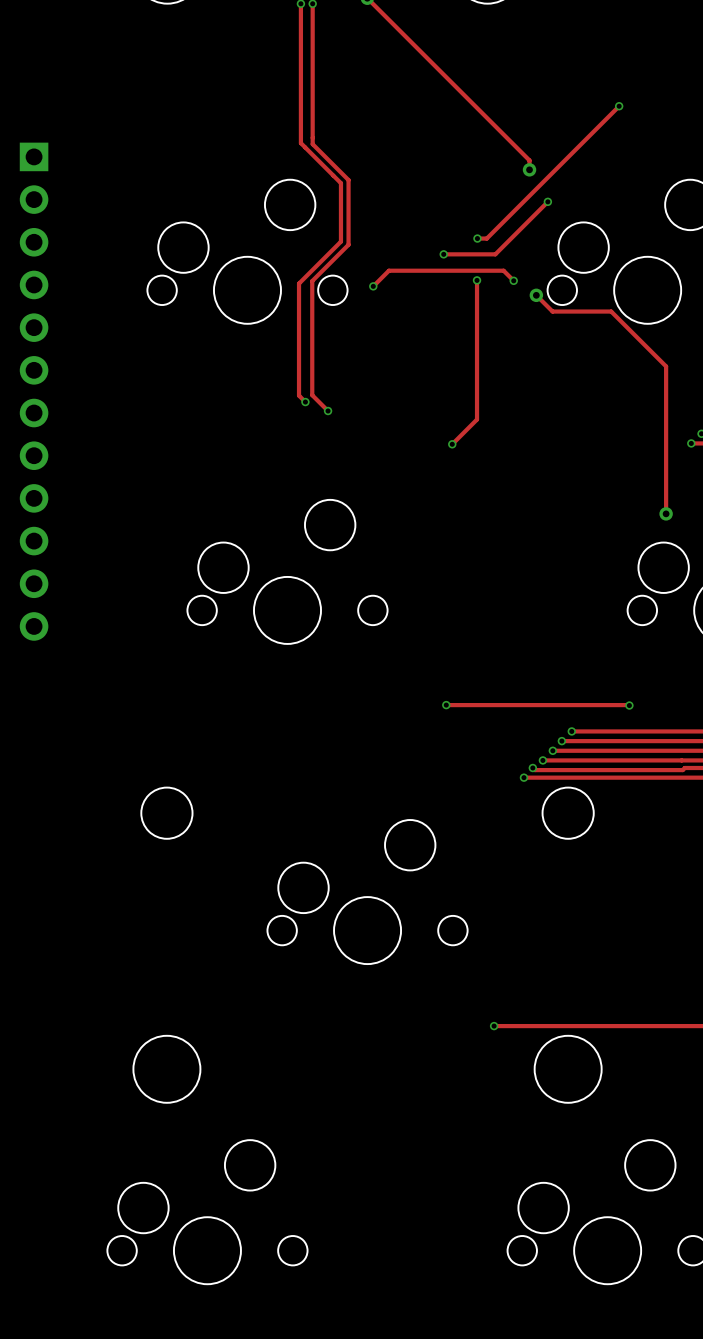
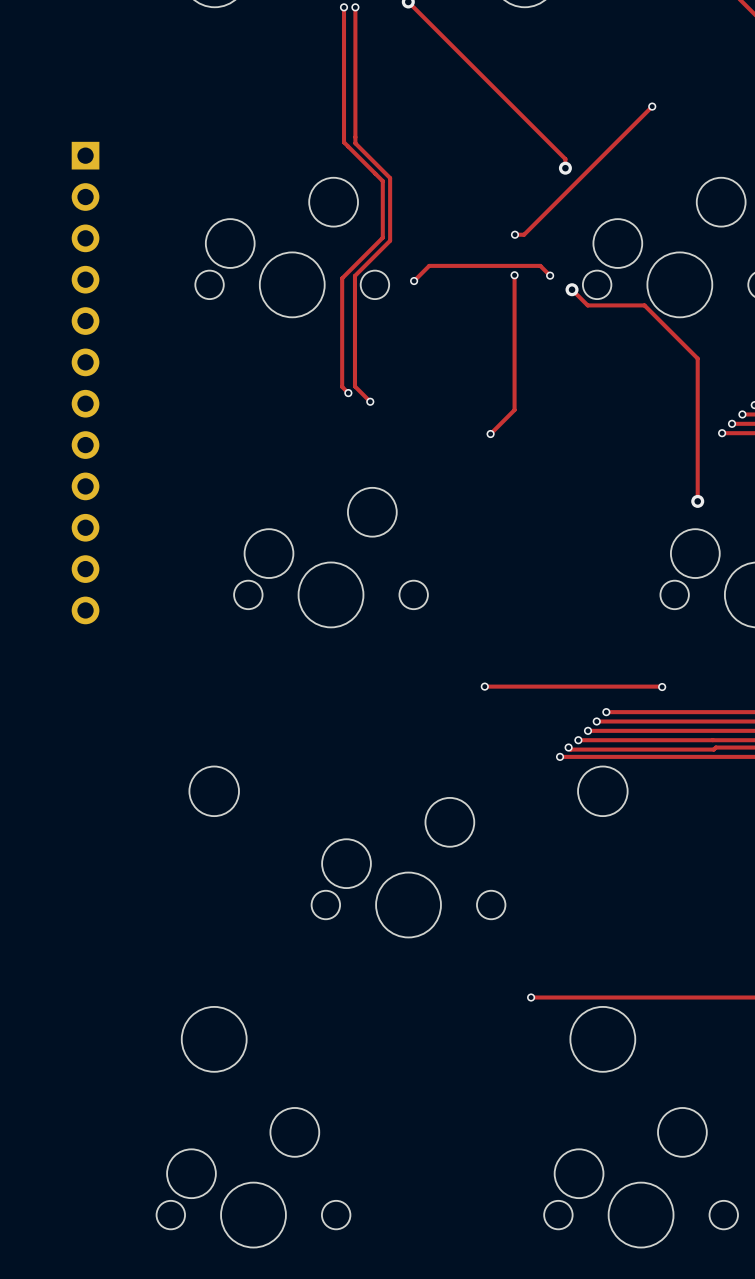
track: (547, 201) (495, 254) (443, 254) -> none
via: (547, 201) -> none
via: (443, 254) -> none

